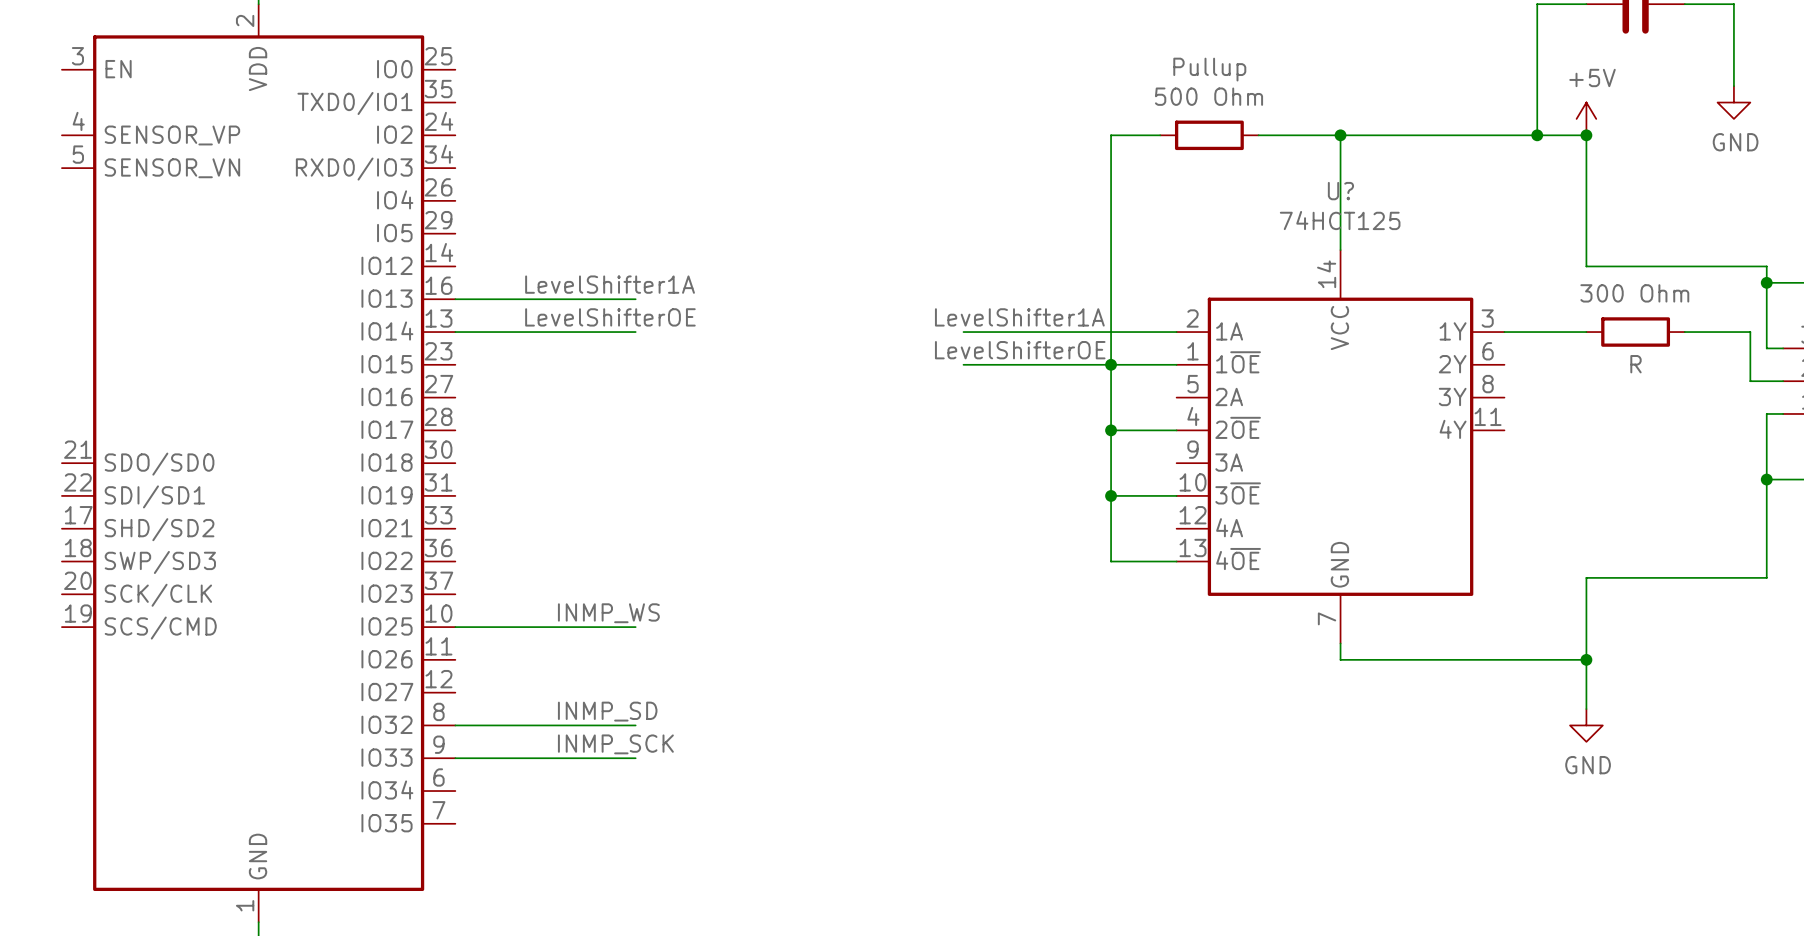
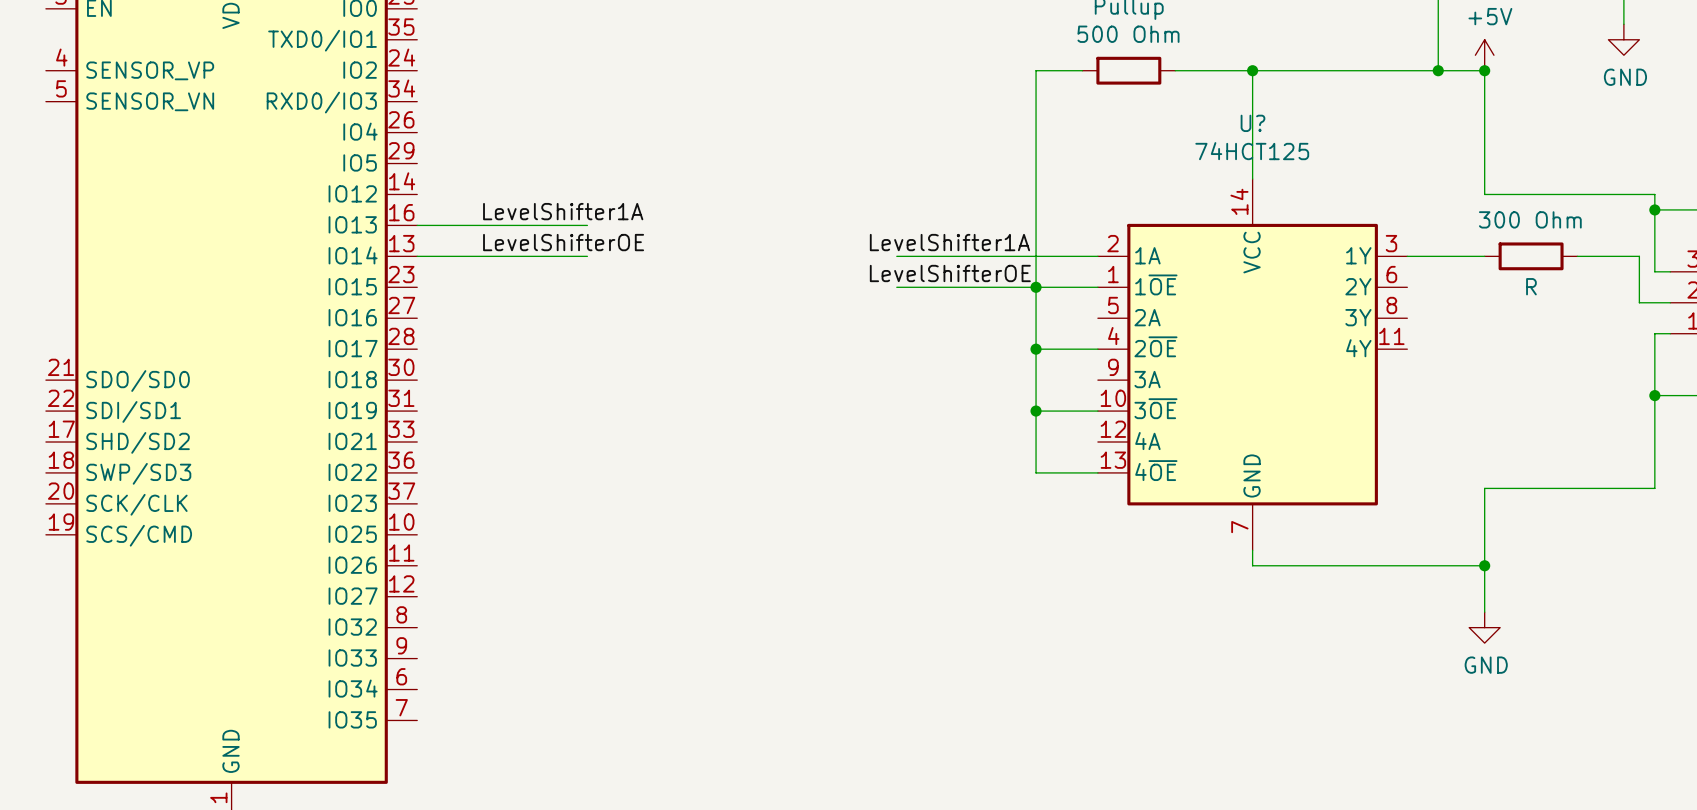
label: INMP_WS (608, 613) -> none
wire: (455, 627) (635, 627) -> none
label: INMP_SD (607, 711) -> none
wire: (455, 725) (635, 725) -> none
label: INMP_SCK (615, 744) -> none
wire: (455, 758) (635, 758) -> none

